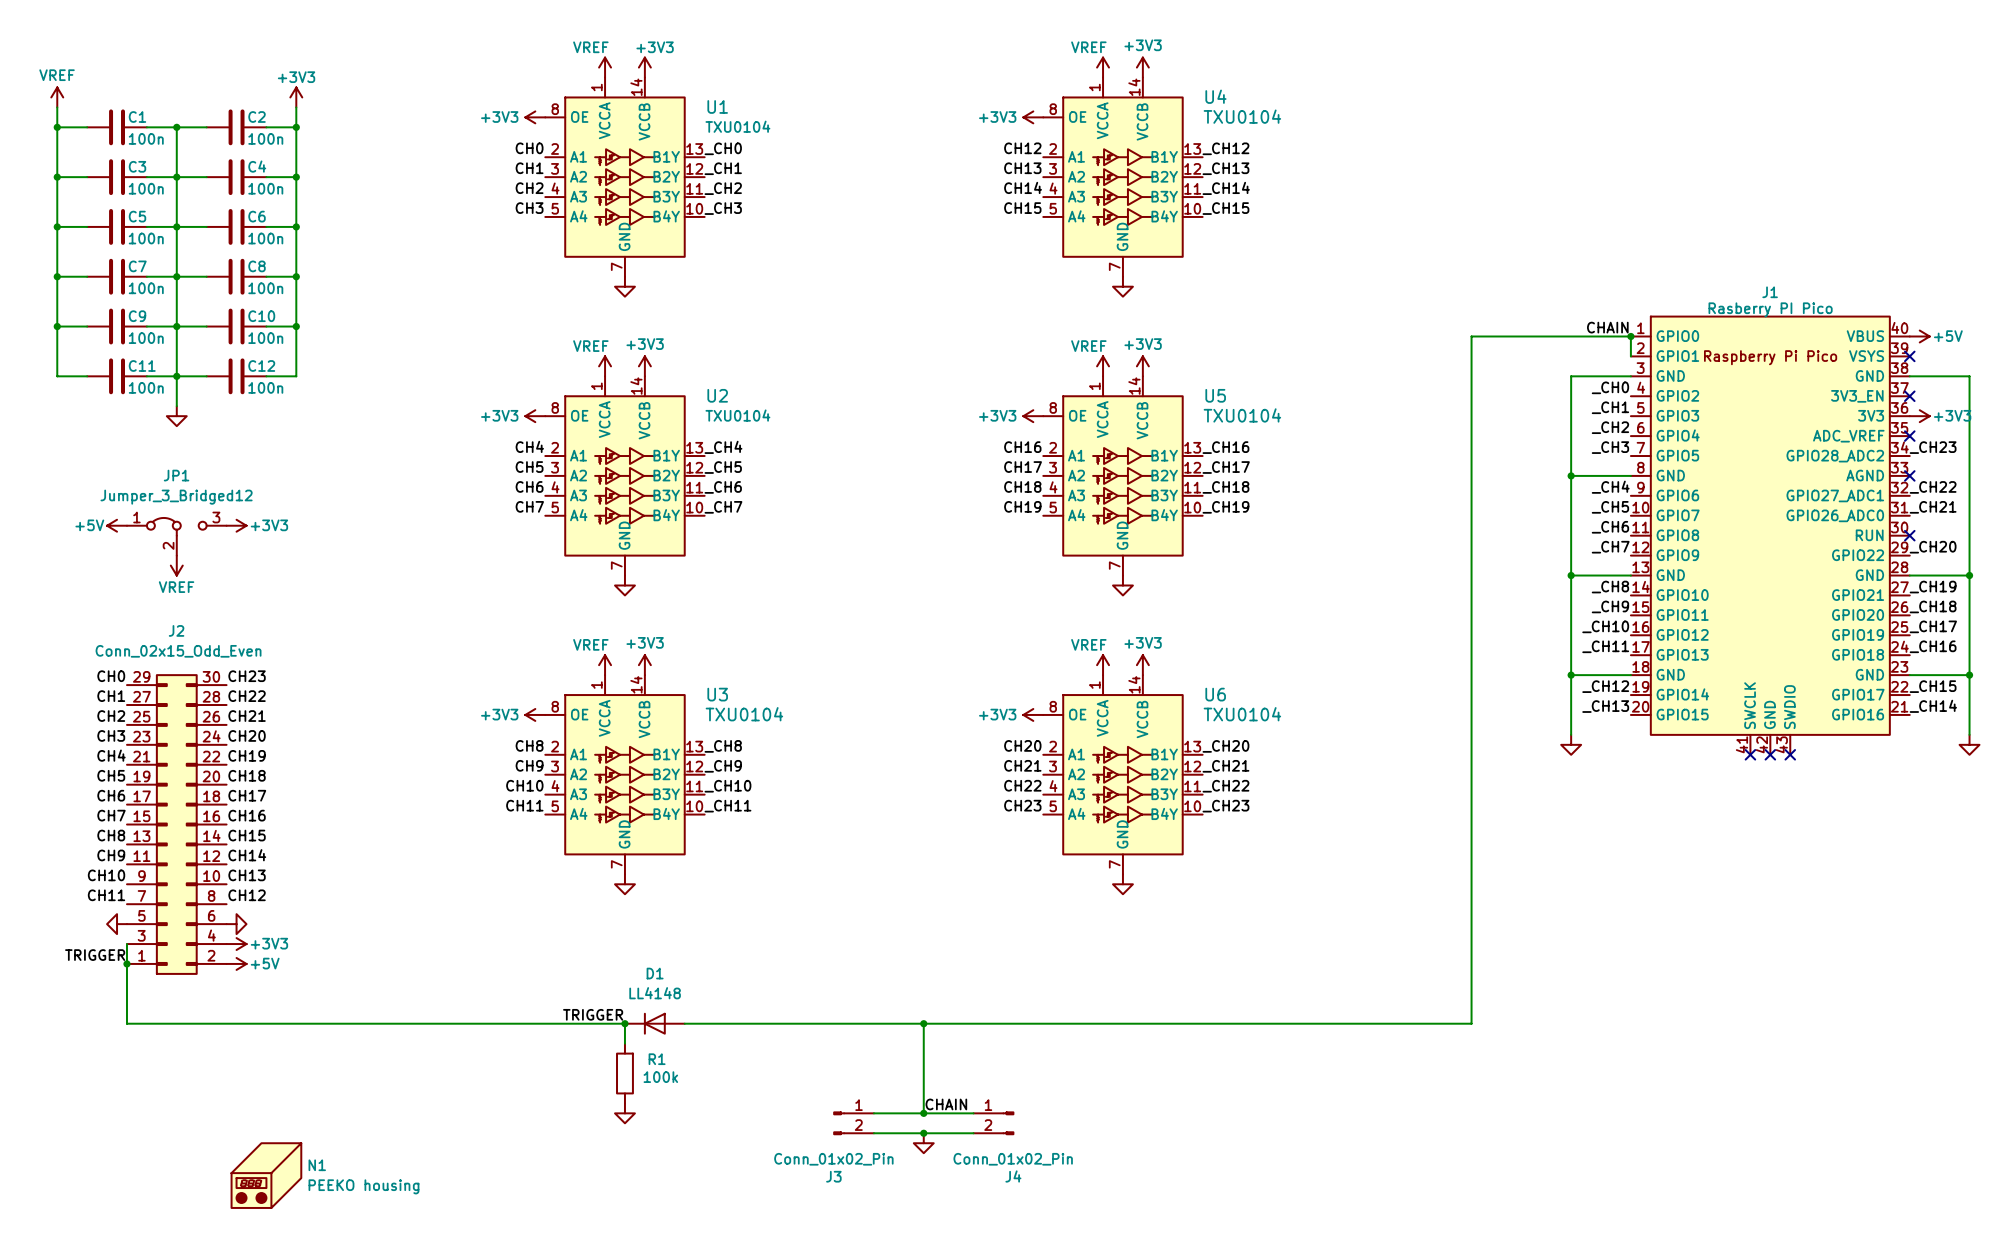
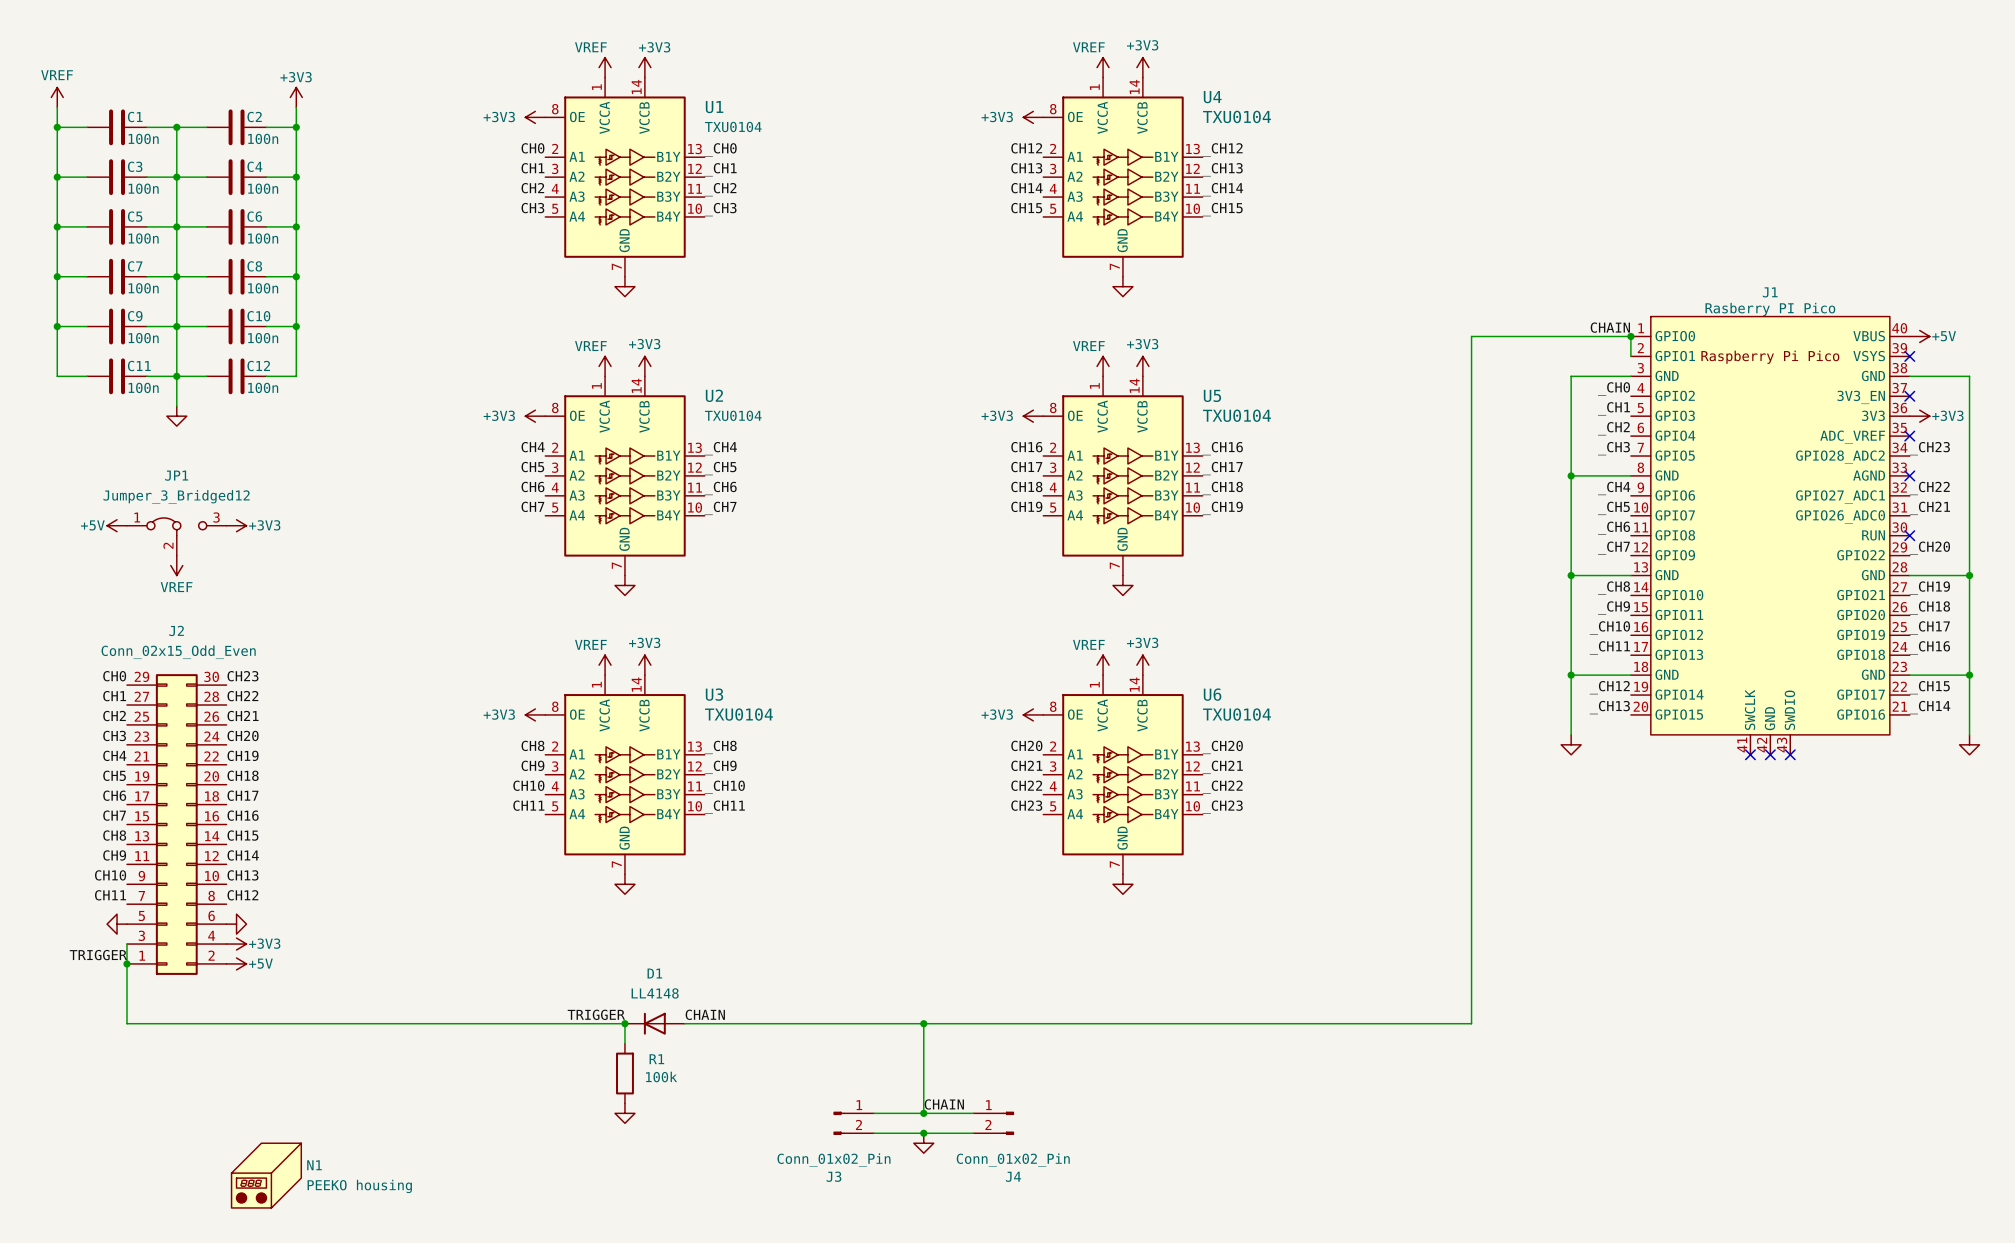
label: none -> CHAIN (705, 1014)

